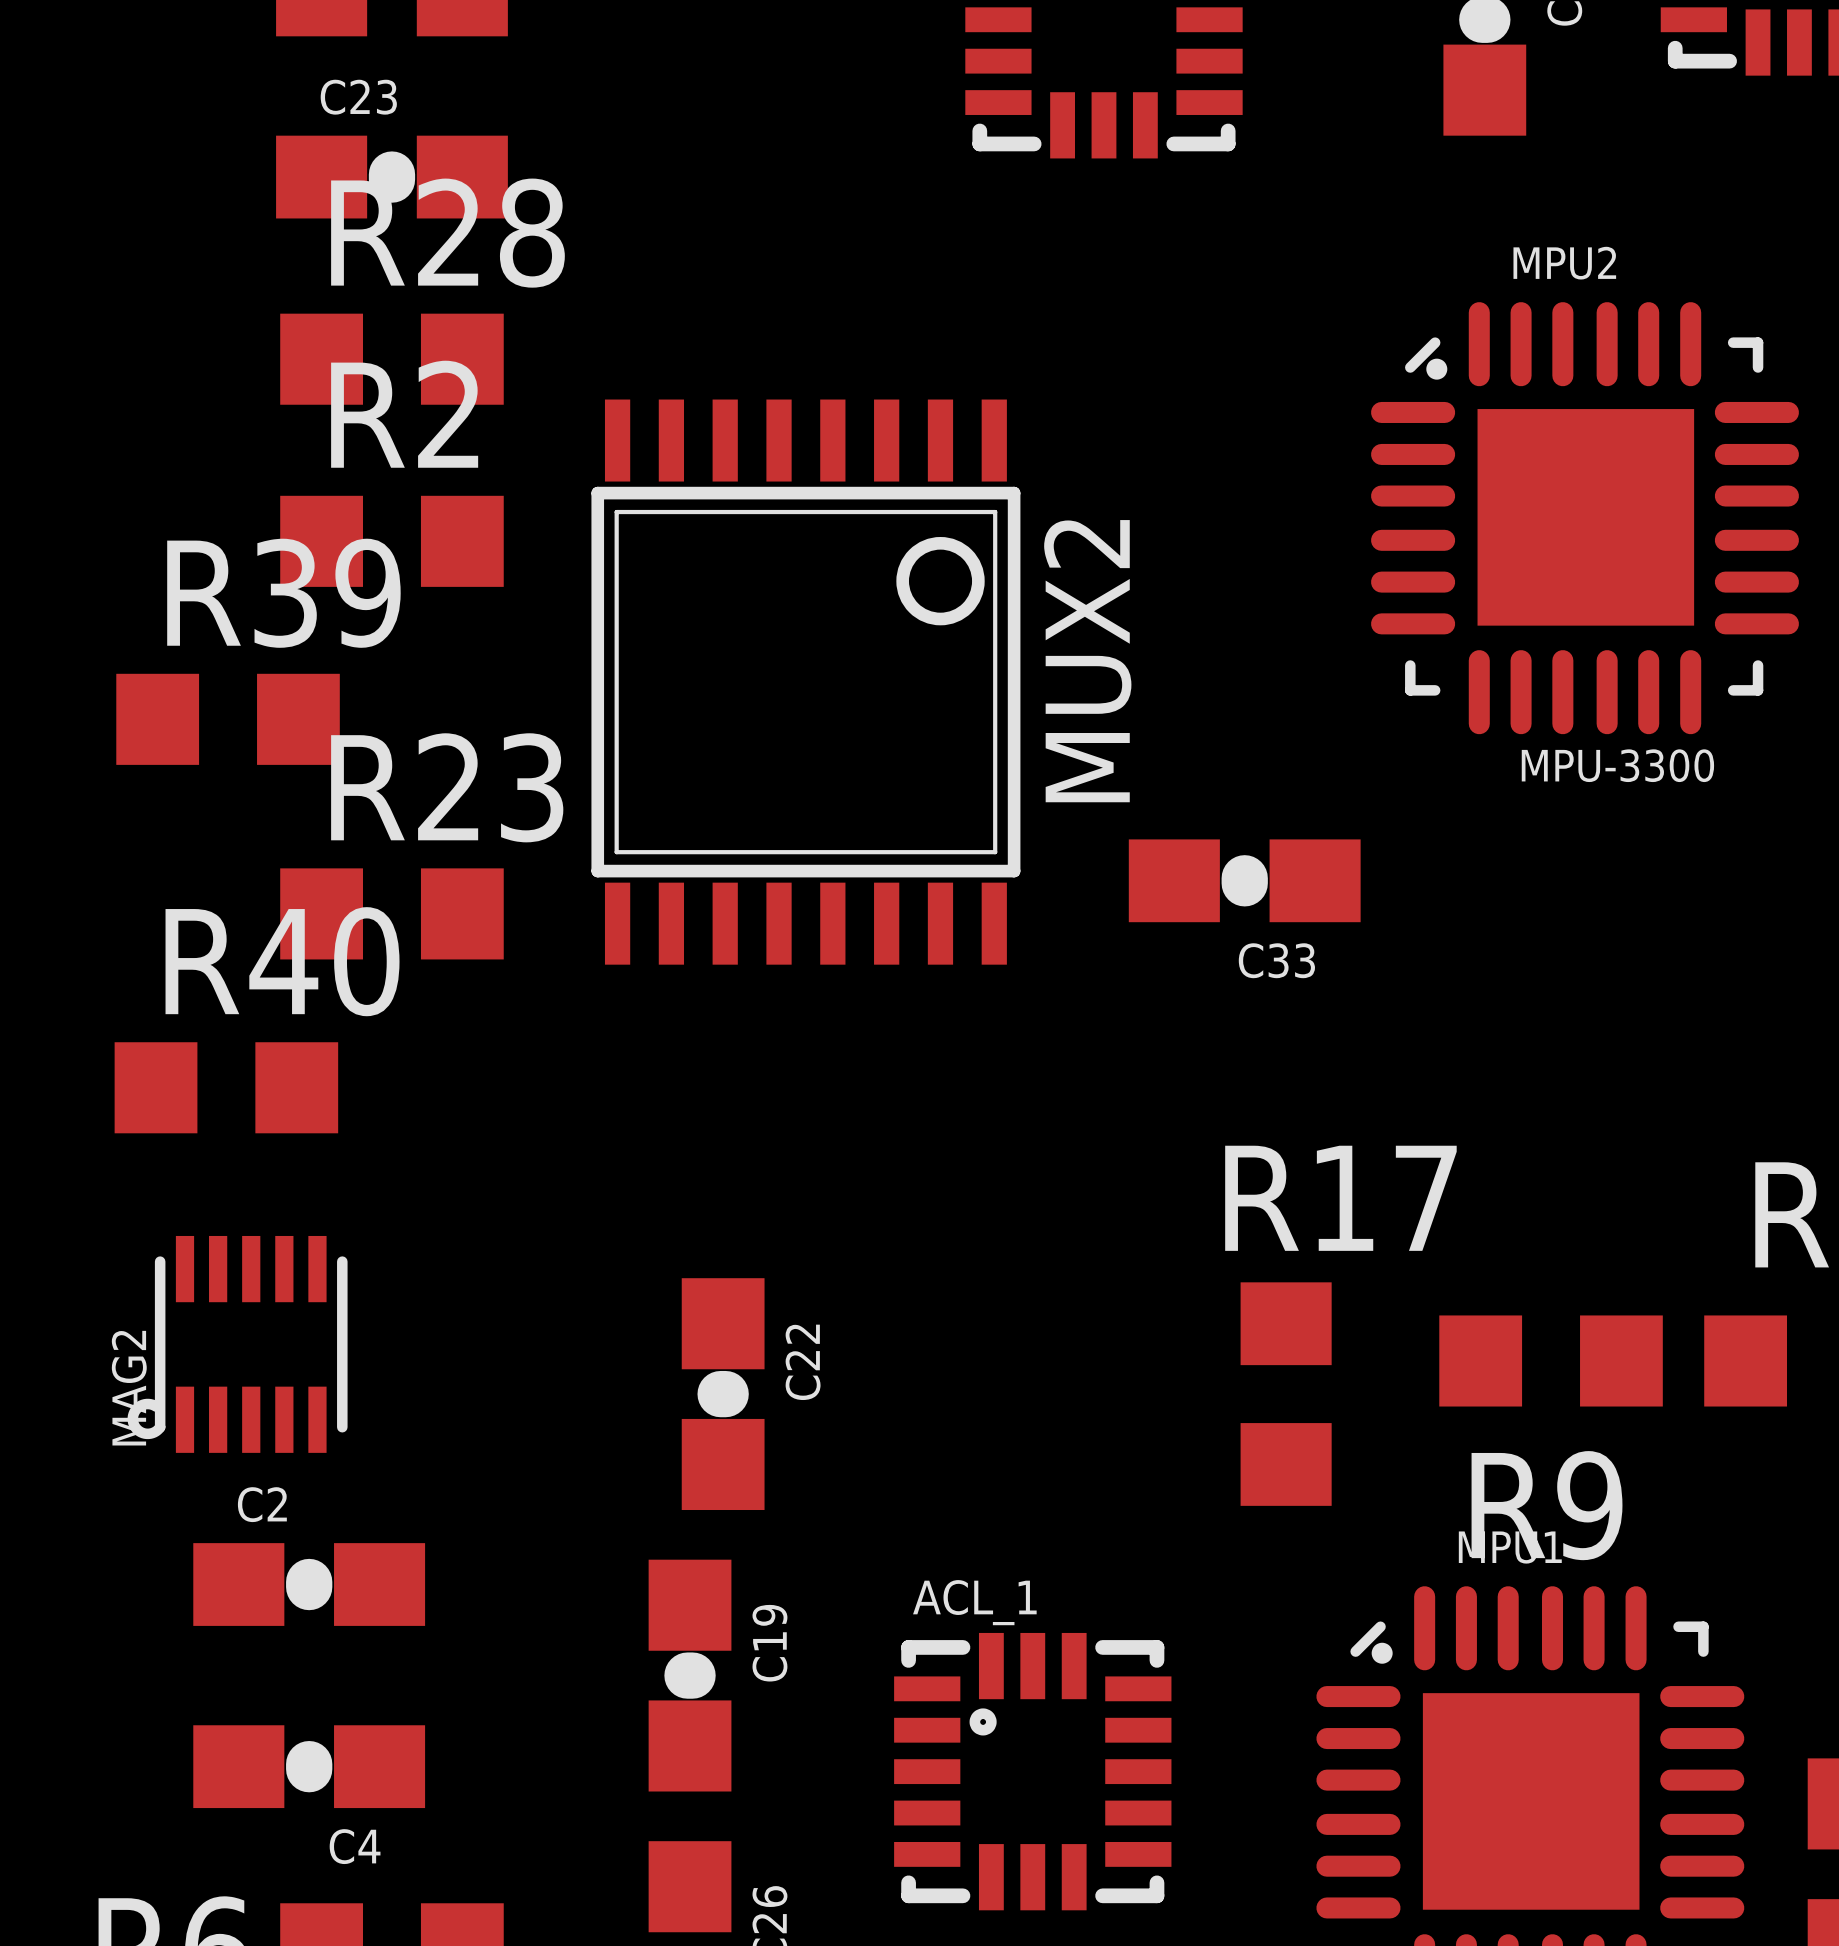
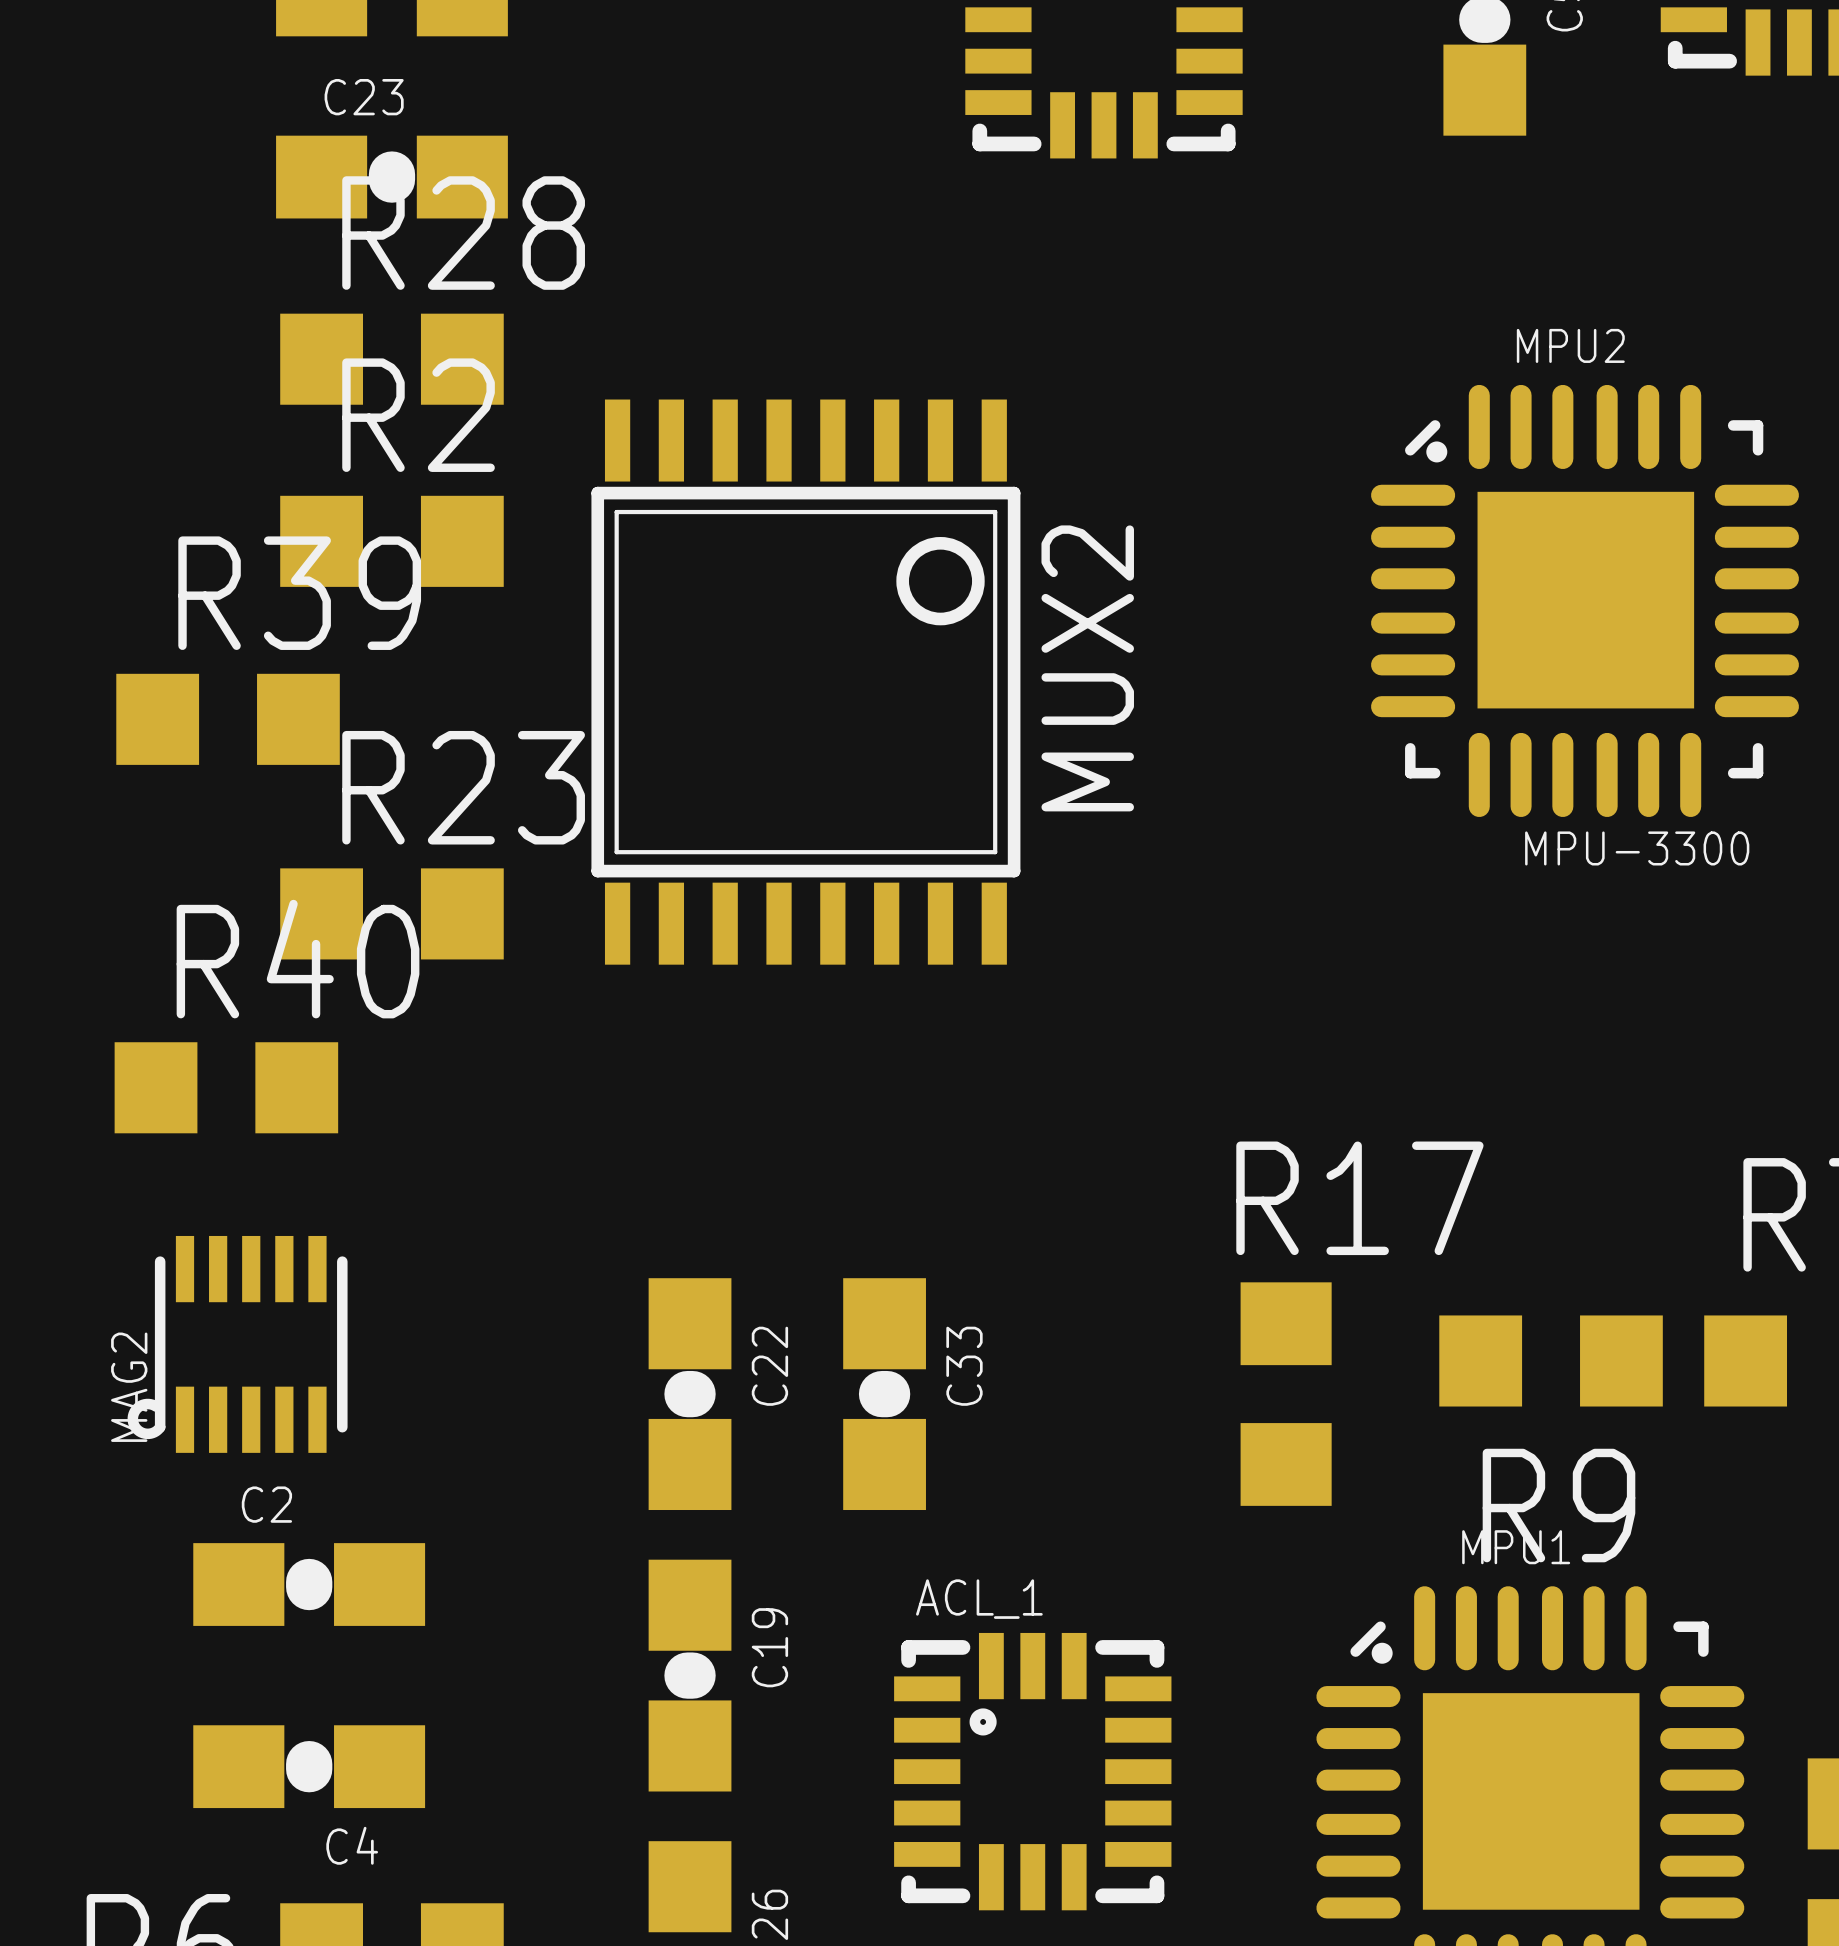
MPU2 position: (1585, 518) -> (1585, 600)
C33 rotation: 0° (1244, 880) -> 90° clockwise (884, 1394)
C33 position: (1244, 880) -> (884, 1394)
C22 position: (723, 1394) -> (690, 1394)

